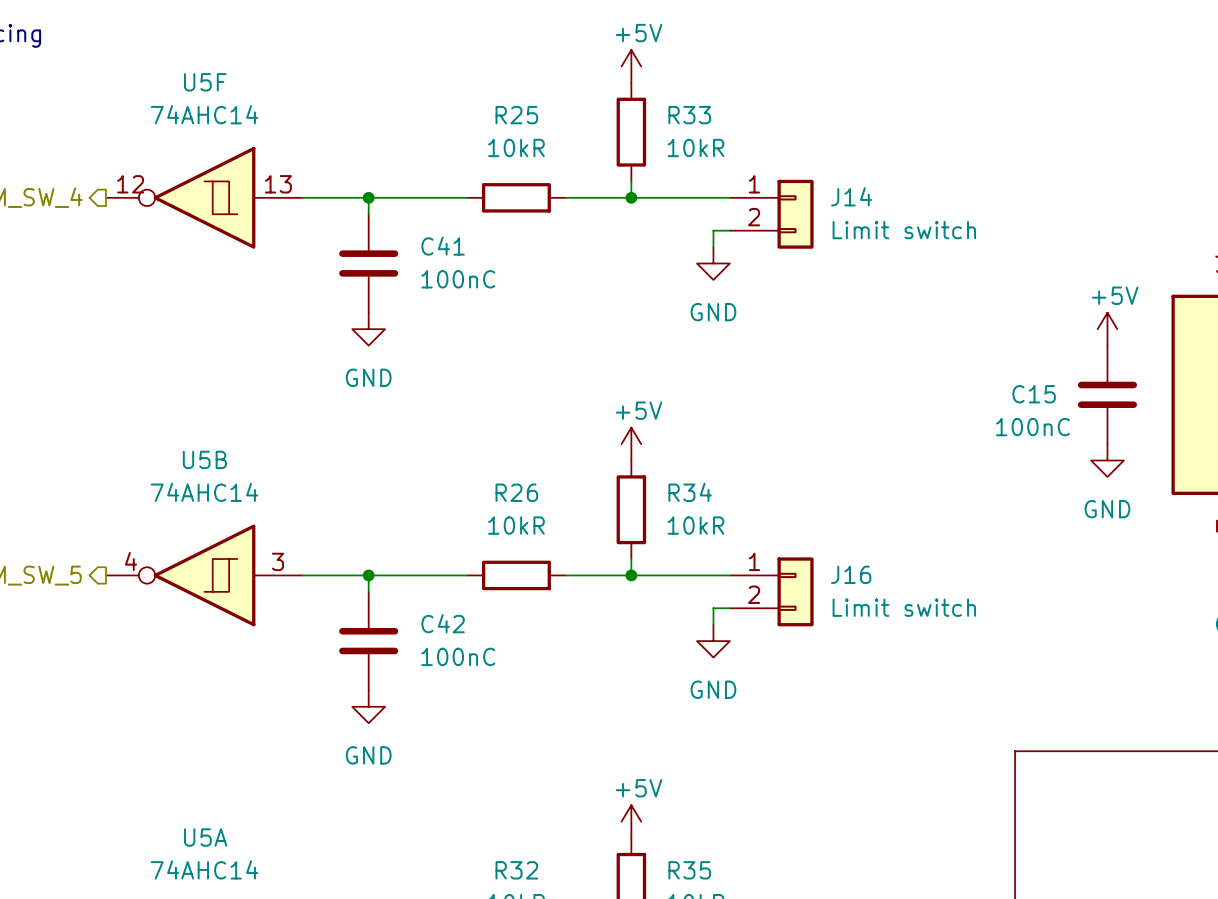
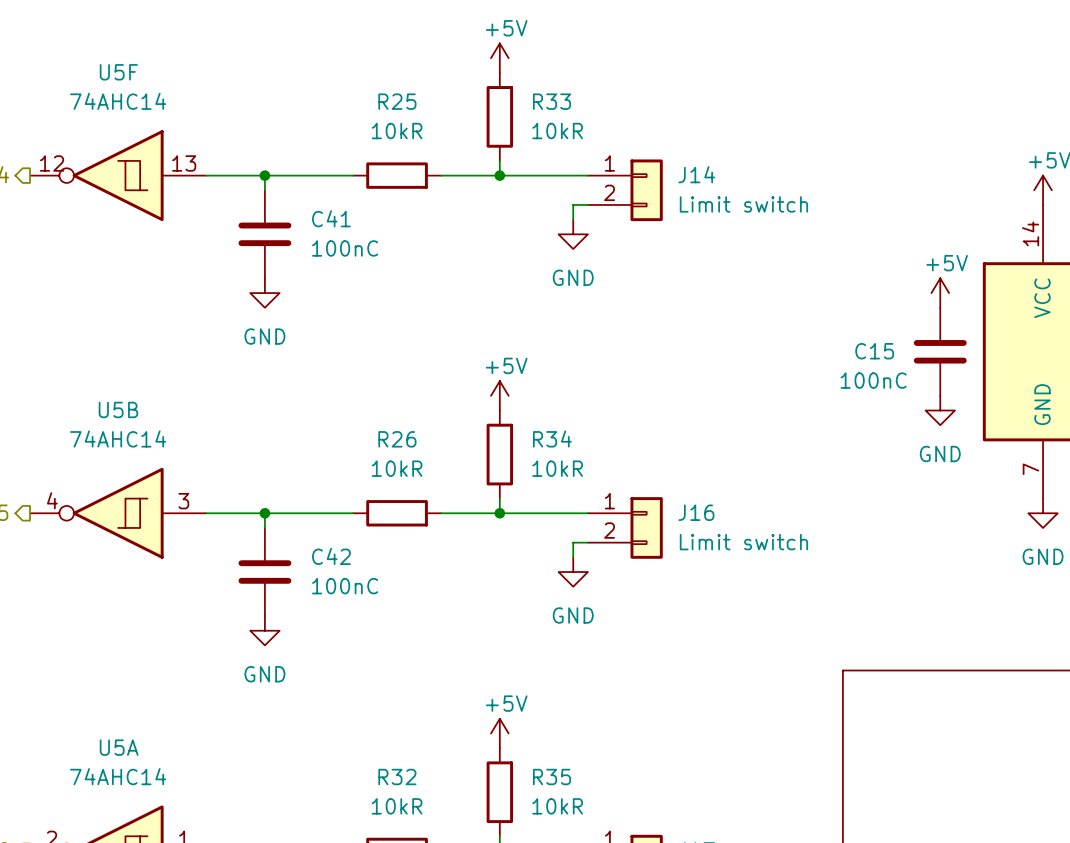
power symbol position: +5V (1107, 329) -> +5V (940, 293)
C15 position: (1107, 394) -> (940, 351)
power symbol position: GND (1107, 460) -> GND (940, 410)

